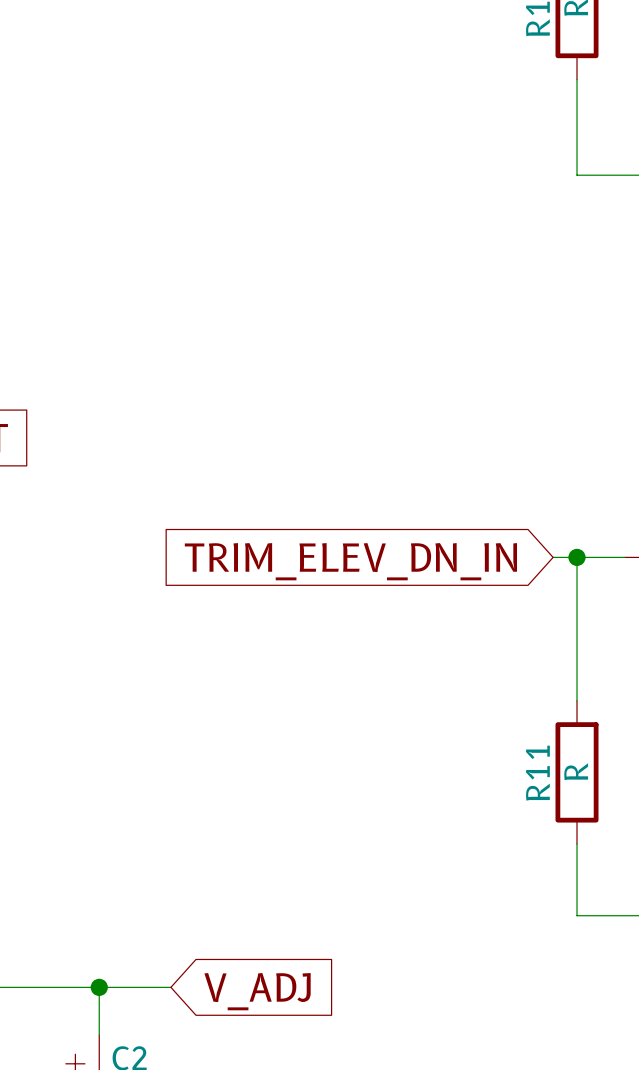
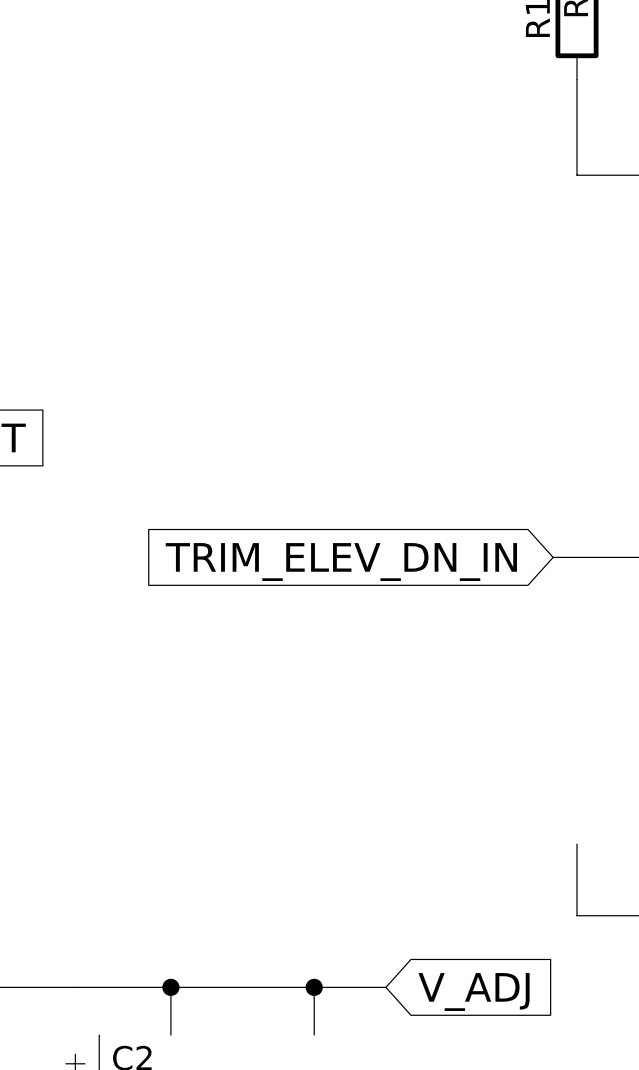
wire: (577, 557) (577, 700) -> none
junction: (577, 557) -> none
R11: R (577, 772) -> none
wire: (99, 987) (99, 1035) -> (314, 987) (314, 1035)
junction position: (99, 987) -> (170, 987)
junction: none -> (314, 987)
wire: none -> (385, 987) (170, 987) (170, 1035)
global label position: V_ADJ (257, 991) -> V_ADJ (474, 992)

